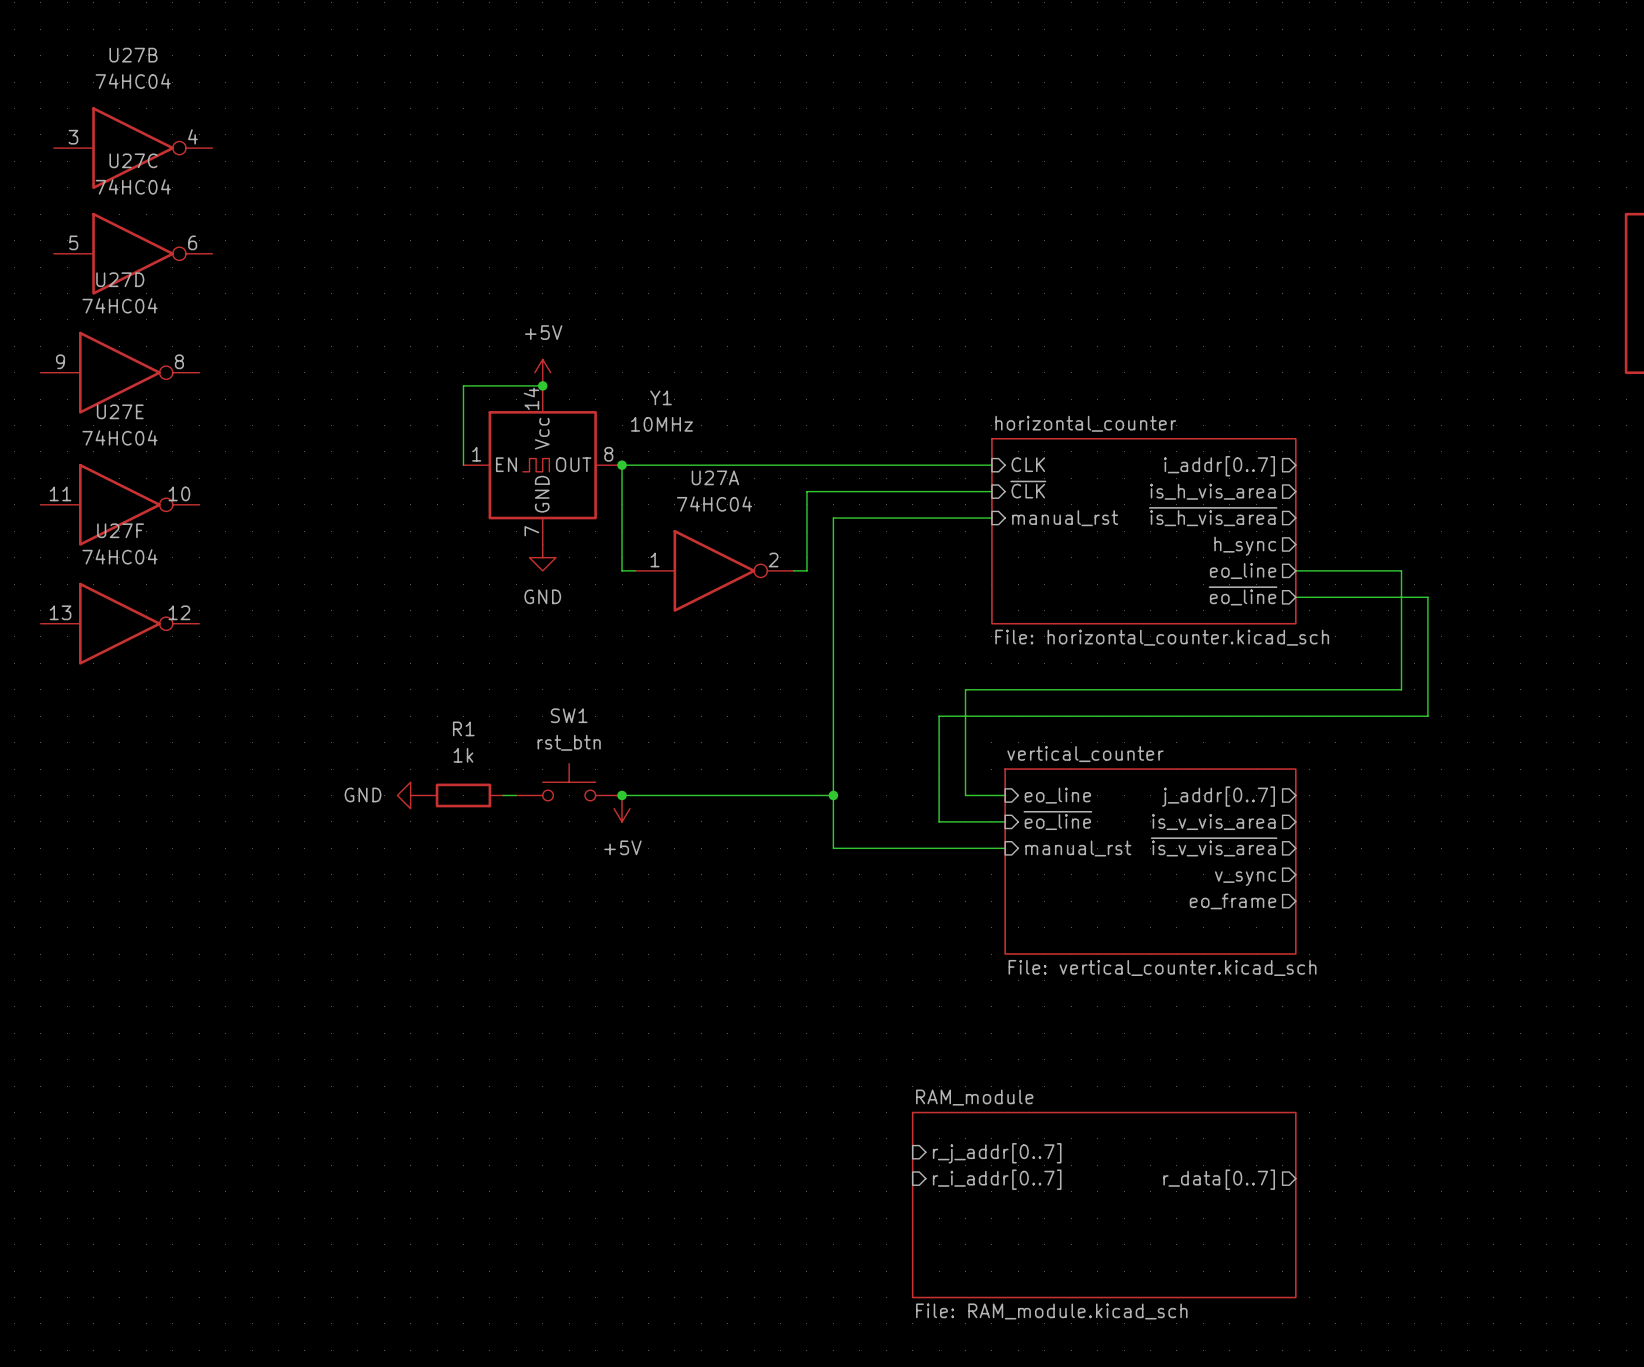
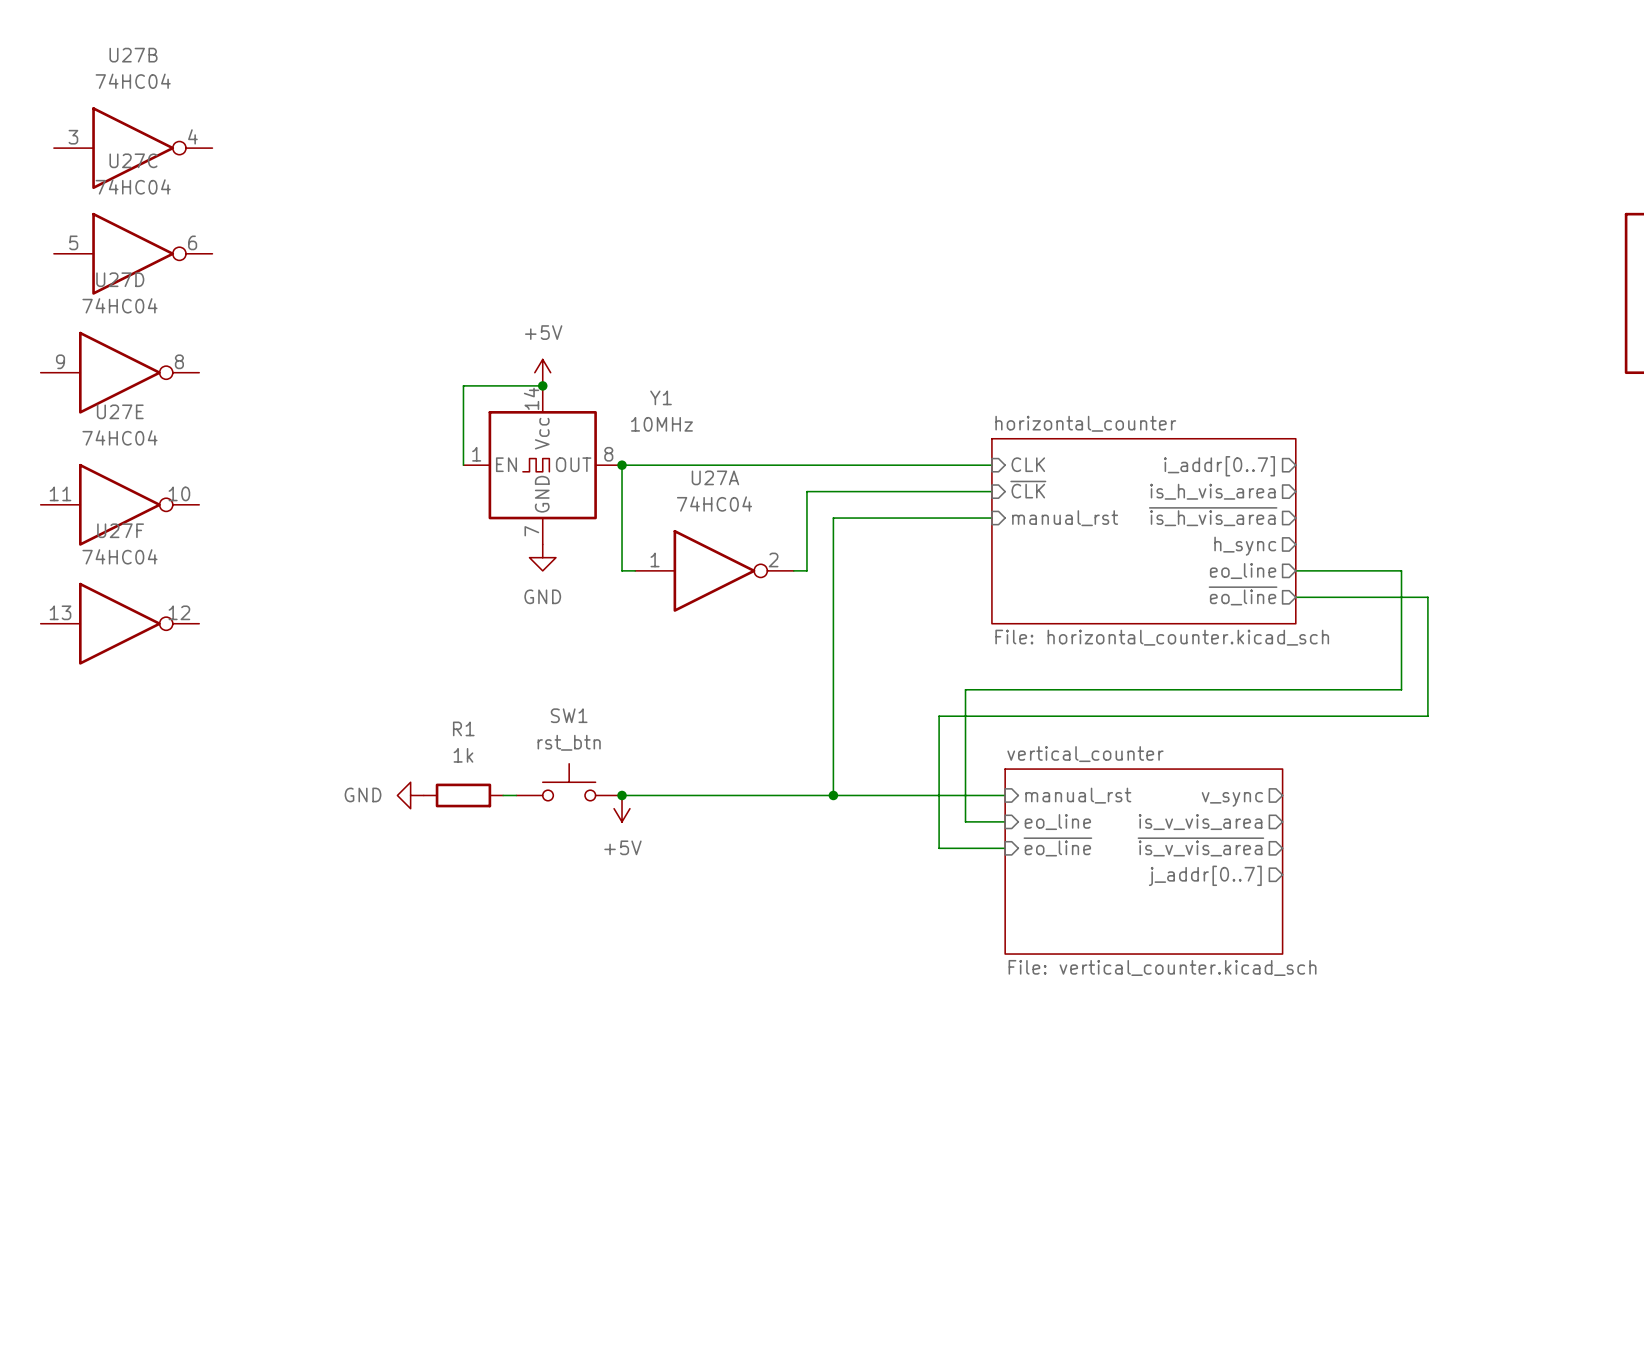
sheet vertical_counter shape: [1004, 768, 1297, 955] -> [1004, 768, 1284, 955]
wire: (833, 795) (833, 848) (939, 848) -> (833, 795) (965, 795) (965, 821)
sheet pin: eo_line (1057, 795) -> manual_rst (1078, 795)
sheet pin position: j_addr[0..7] (1218, 796) -> j_addr[0..7] (1205, 875)
sheet pin: ~{eo_line} (1057, 820) -> eo_line (1057, 822)
wire: (939, 821) (965, 821) -> (939, 821) (939, 848)
sheet pin position: is_v_vis_area (1213, 822) -> is_v_vis_area (1200, 822)
sheet pin position: ~{is_v_vis_area} (1214, 846) -> ~{is_v_vis_area} (1200, 846)
sheet pin: manual_rst (1078, 848) -> ~{eo_line} (1057, 846)
sheet pin position: v_sync (1245, 878) -> v_sync (1232, 799)
sheet pin: eo_frame (1233, 901) -> none
sheet pin: r_j_addr[0..7] (997, 1153) -> none
sheet pin: r_i_addr[0..7] (997, 1179) -> none
sheet pin: r_data[0..7] (1219, 1179) -> none
sheet RAM_module: File: RAM_module.kicad_sch (1104, 1205) -> none

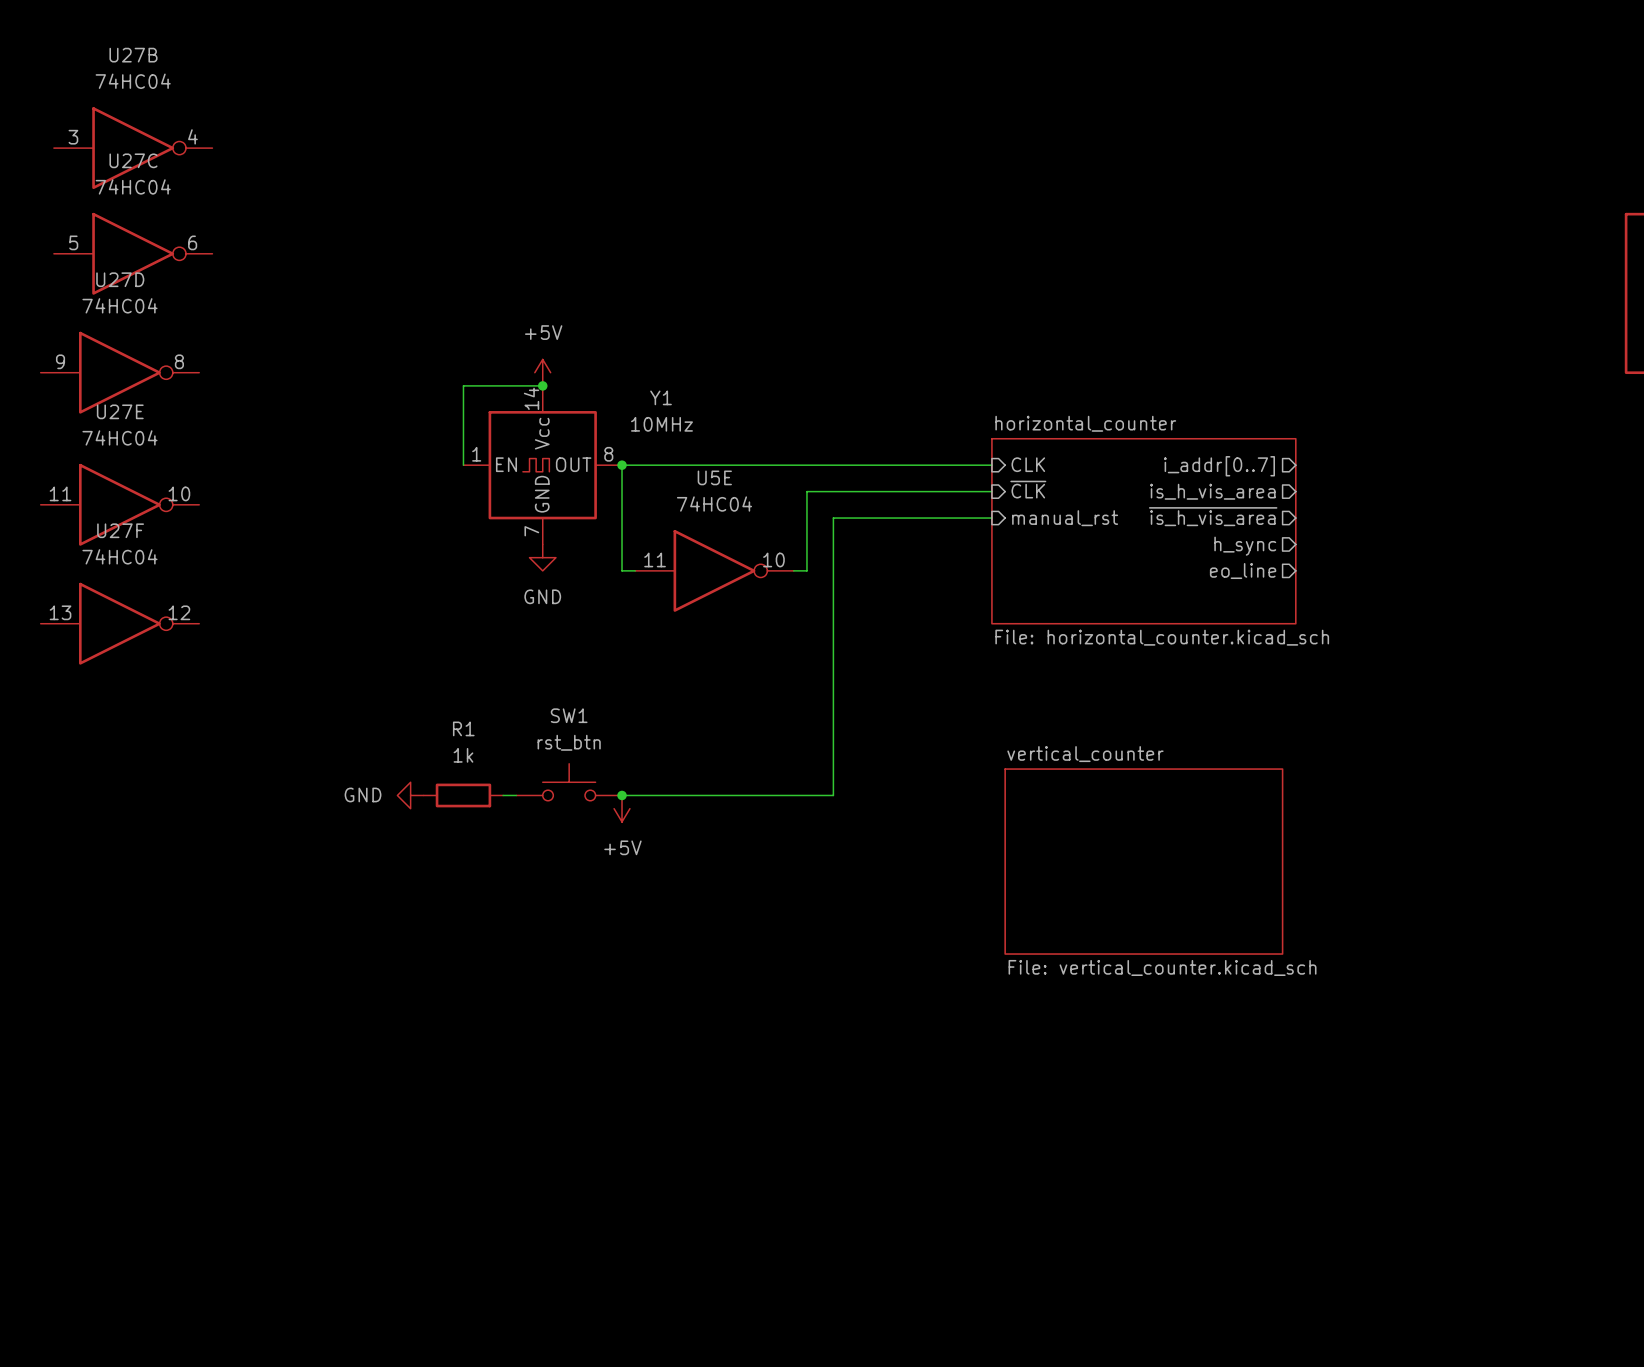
U27A name: U27A (715, 477) -> U5E (714, 477)
U27A pin number: 1 (655, 559) -> 11 (655, 559)
U27A pin number: 2 (773, 559) -> 10 (773, 559)
wire: (1295, 570) (1401, 570) (1401, 689) (965, 689) (965, 821) (1005, 821) -> none
sheet pin: ~{eo_line} (1243, 595) -> none
wire: (1295, 597) (1427, 597) (1427, 716) (939, 716) (939, 848) (1005, 848) -> none
wire: (833, 795) (1005, 795) -> none
junction: (833, 795) -> none
sheet pin: manual_rst (1078, 795) -> none
sheet pin: v_sync (1232, 799) -> none
sheet pin: eo_line (1057, 822) -> none
sheet pin: is_v_vis_area (1200, 822) -> none
sheet pin: ~{eo_line} (1057, 846) -> none
sheet pin: ~{is_v_vis_area} (1200, 846) -> none
sheet pin: j_addr[0..7] (1205, 875) -> none

